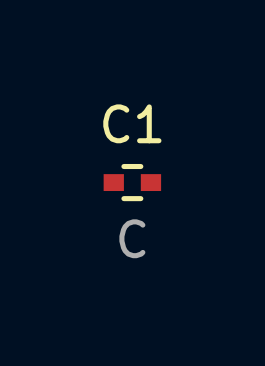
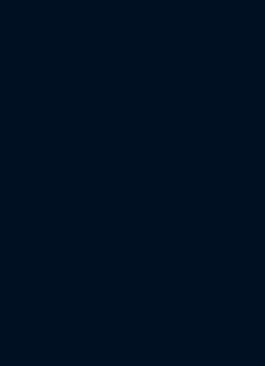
C1: C (132, 182) -> none

